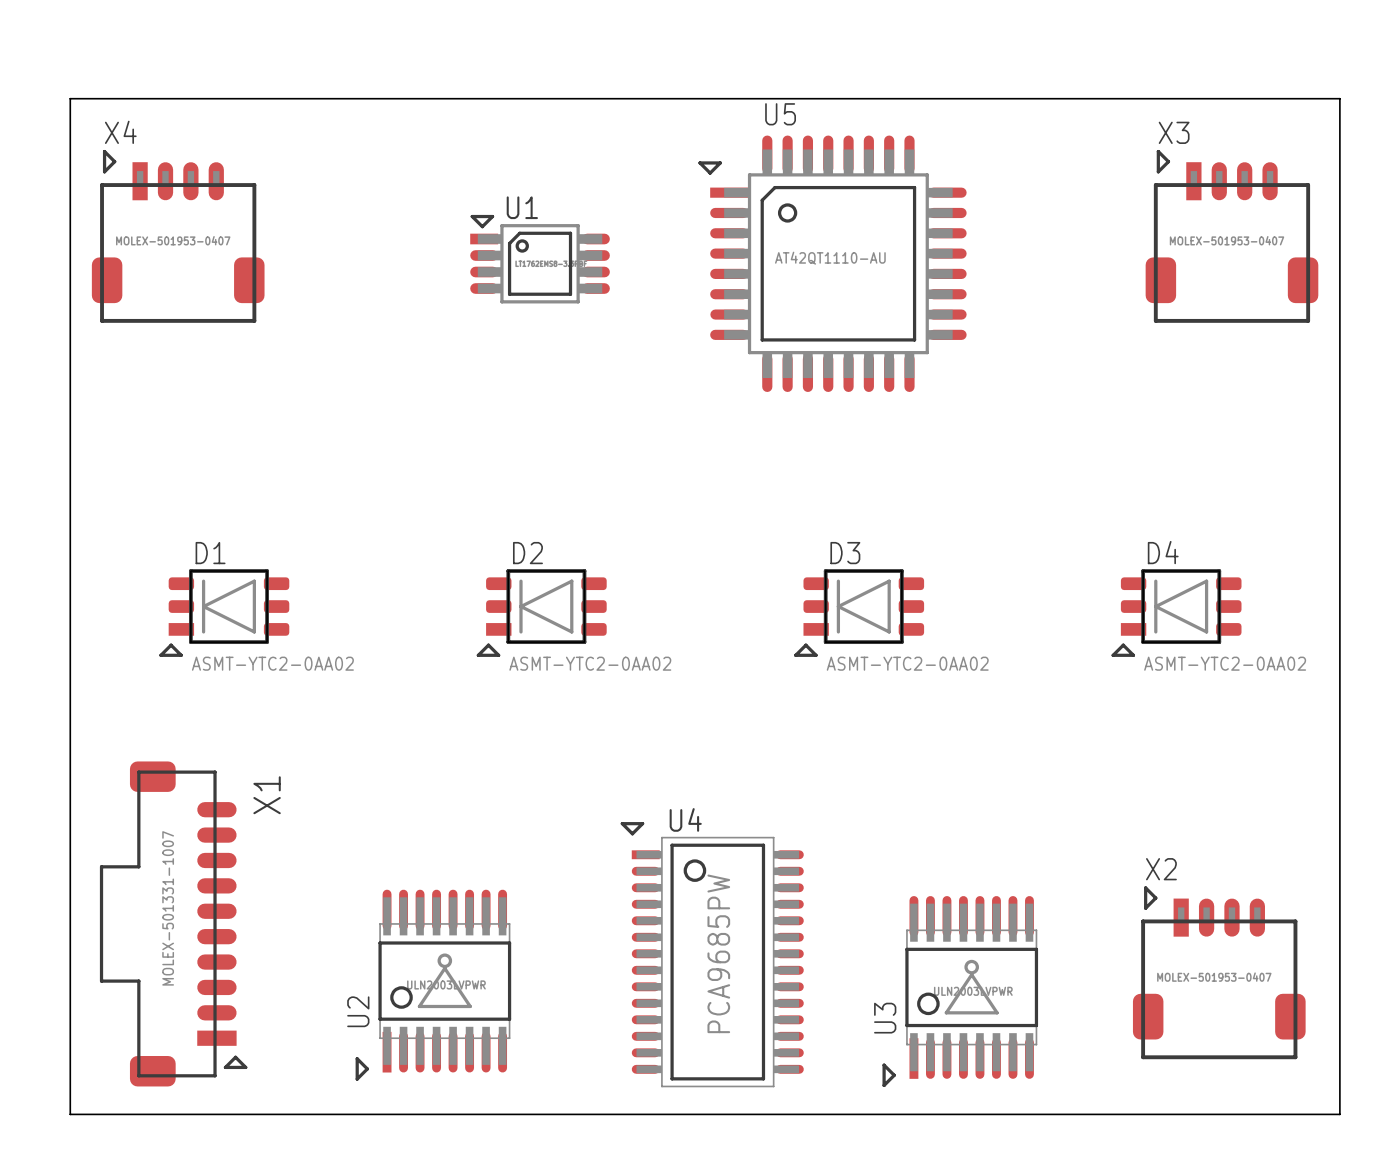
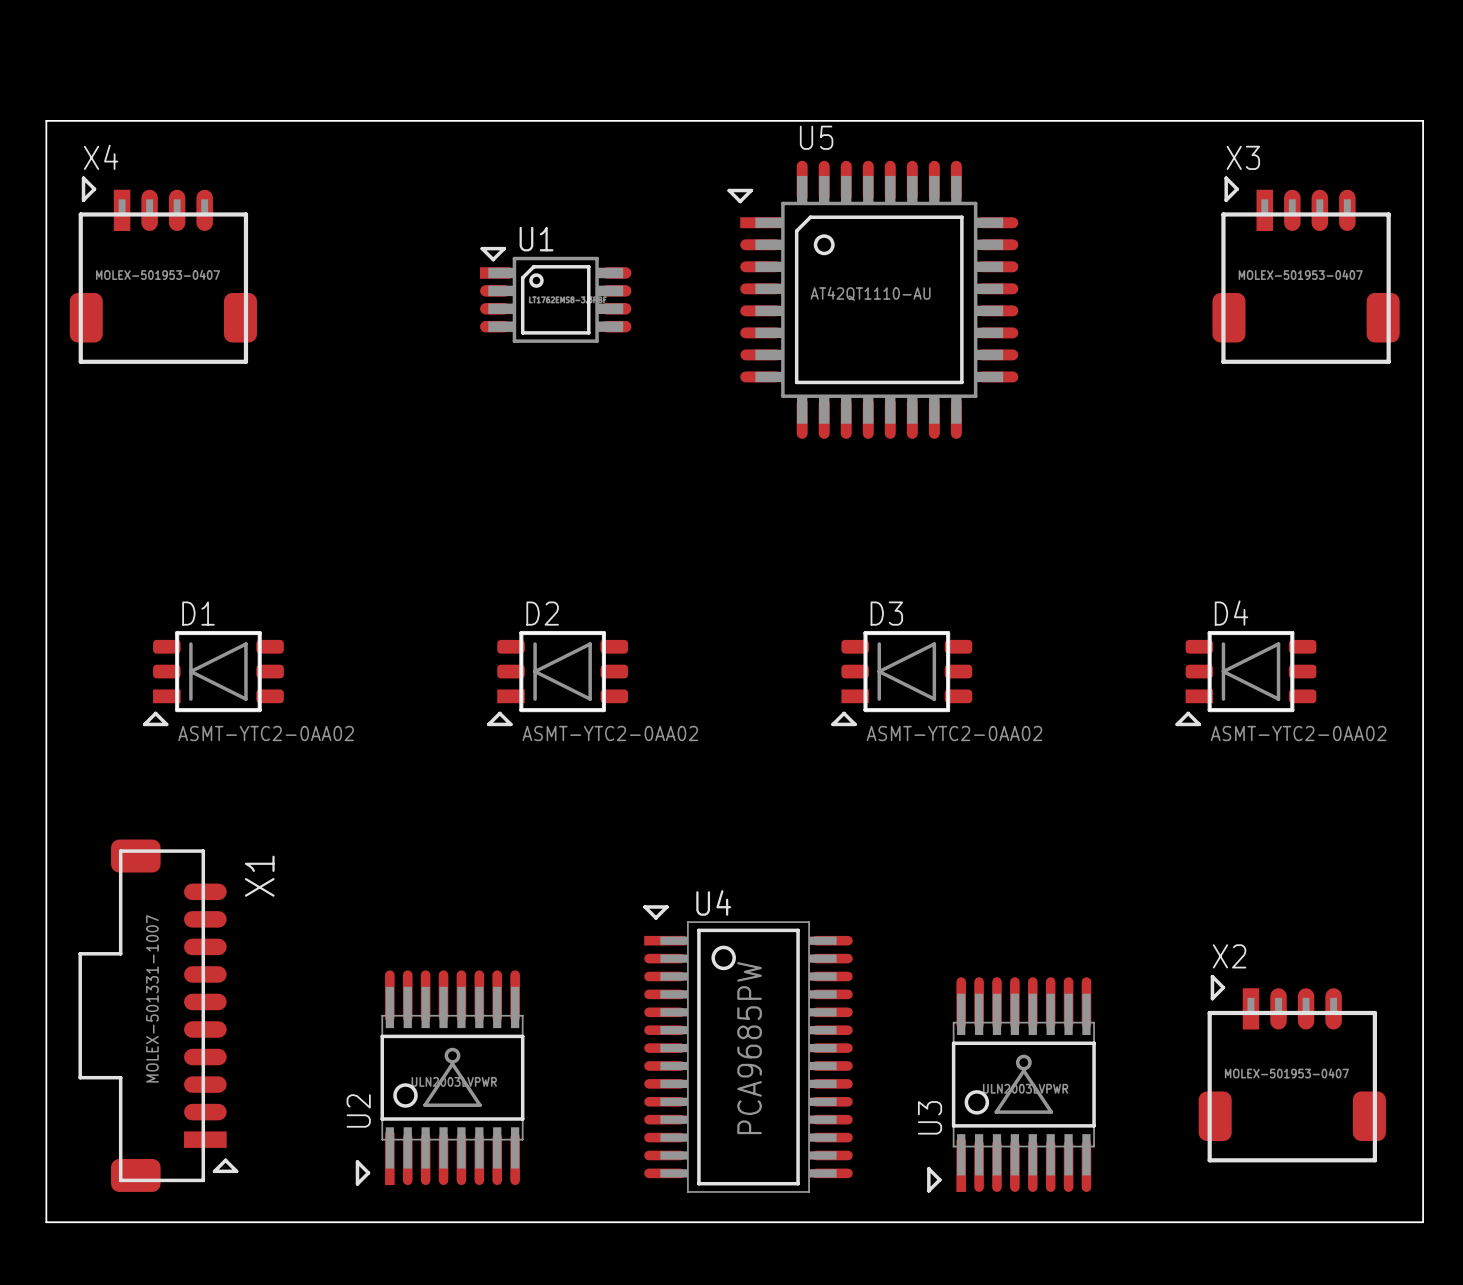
U4 footprint: [620, 822, 804, 1088] -> [643, 905, 853, 1193]
U2 footprint: [355, 889, 512, 1081] -> [355, 970, 525, 1186]
U3 footprint: [882, 896, 1039, 1088] -> [927, 977, 1096, 1193]

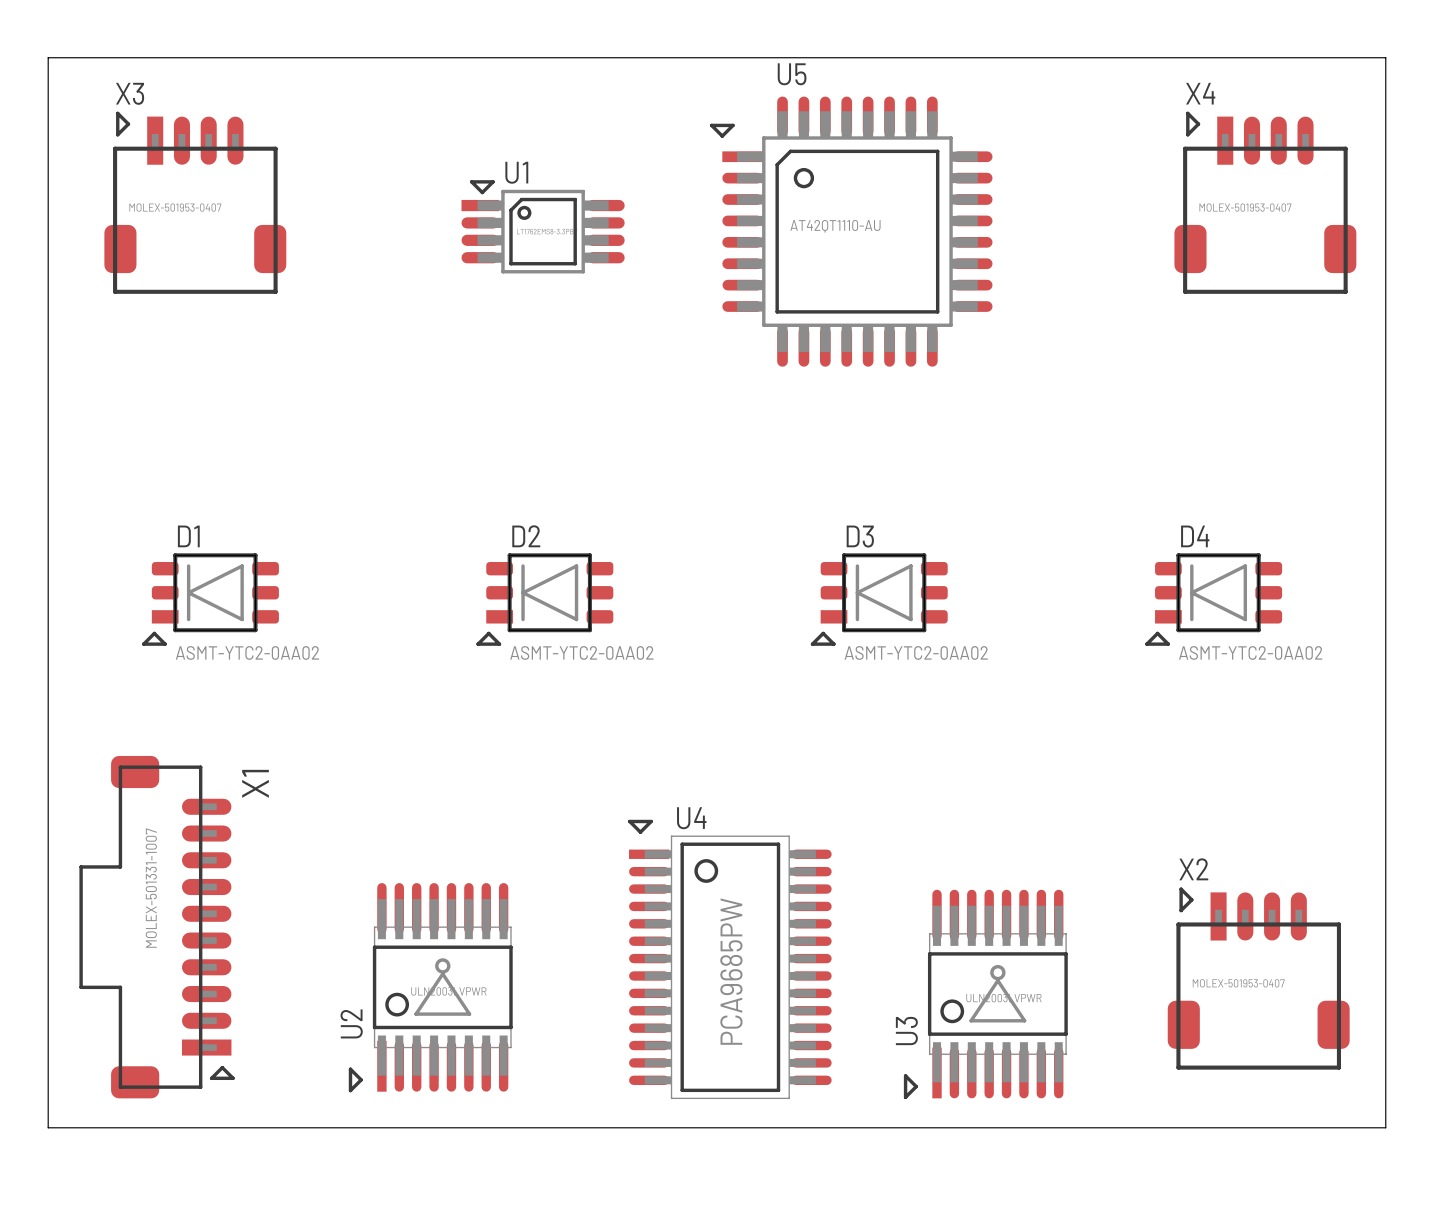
X4 footprint: [69, 176, 257, 364] -> [1174, 111, 1357, 294]
X3 footprint: [1212, 176, 1400, 364] -> [104, 111, 287, 294]
U1 footprint: [480, 246, 632, 343] -> [461, 180, 625, 274]
X1 footprint: [78, 839, 239, 1192] -> [79, 755, 235, 1099]
X2 footprint: [1198, 974, 1386, 1163] -> [1167, 887, 1350, 1070]

